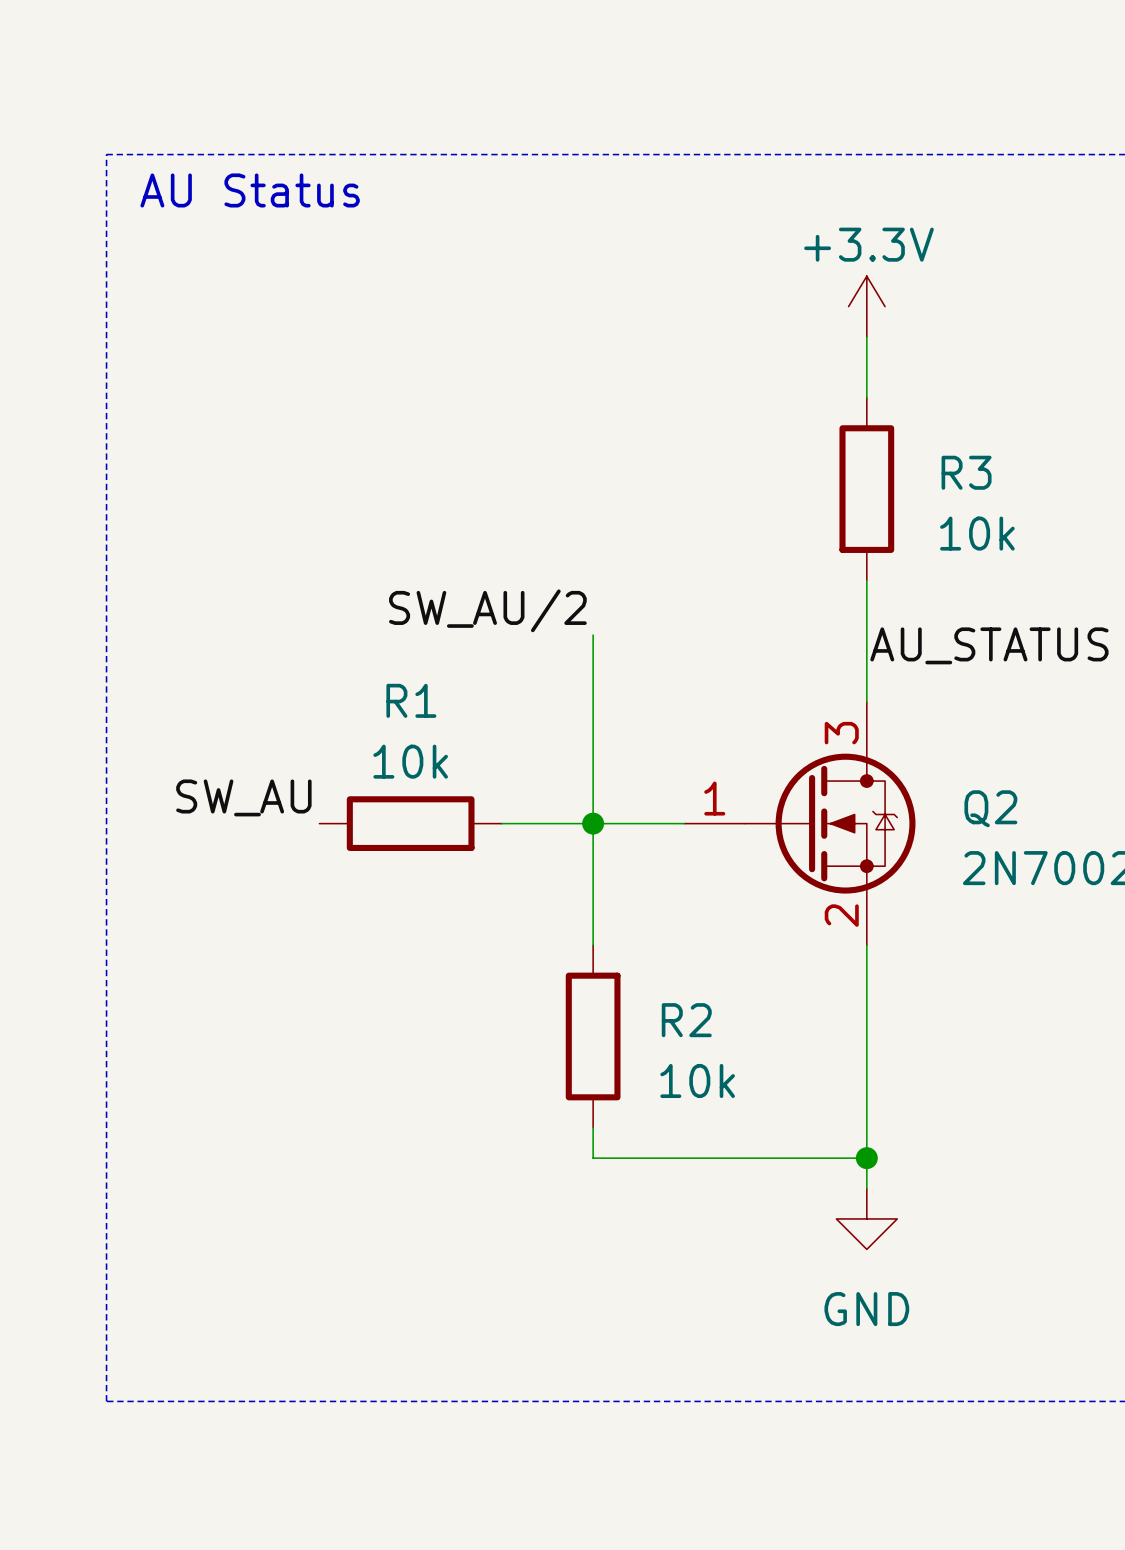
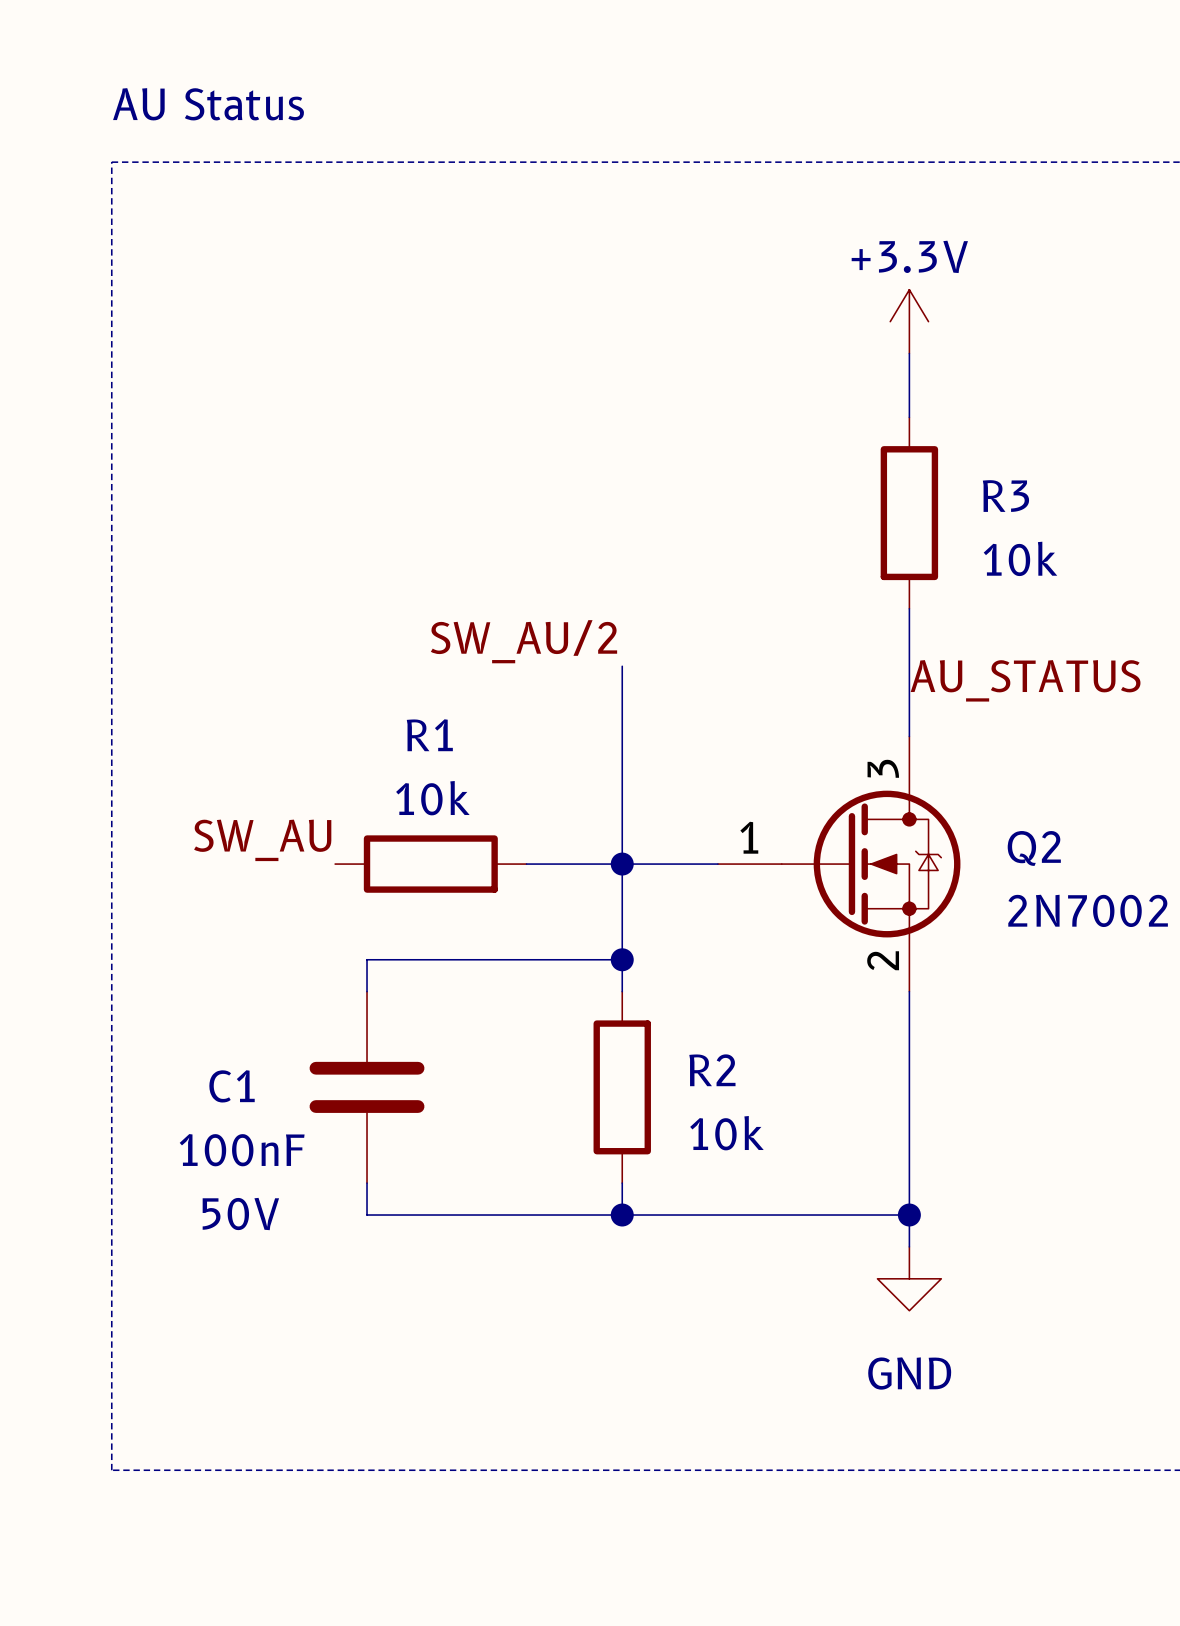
text position: AU Status (250, 190) -> AU Status (208, 104)
wire: none -> (622, 959) (367, 959) (367, 991)
junction: none -> (622, 959)
C1: none -> 100nF (367, 1087)
wire: none -> (367, 1183) (367, 1215) (622, 1215)
junction: none -> (622, 1215)

